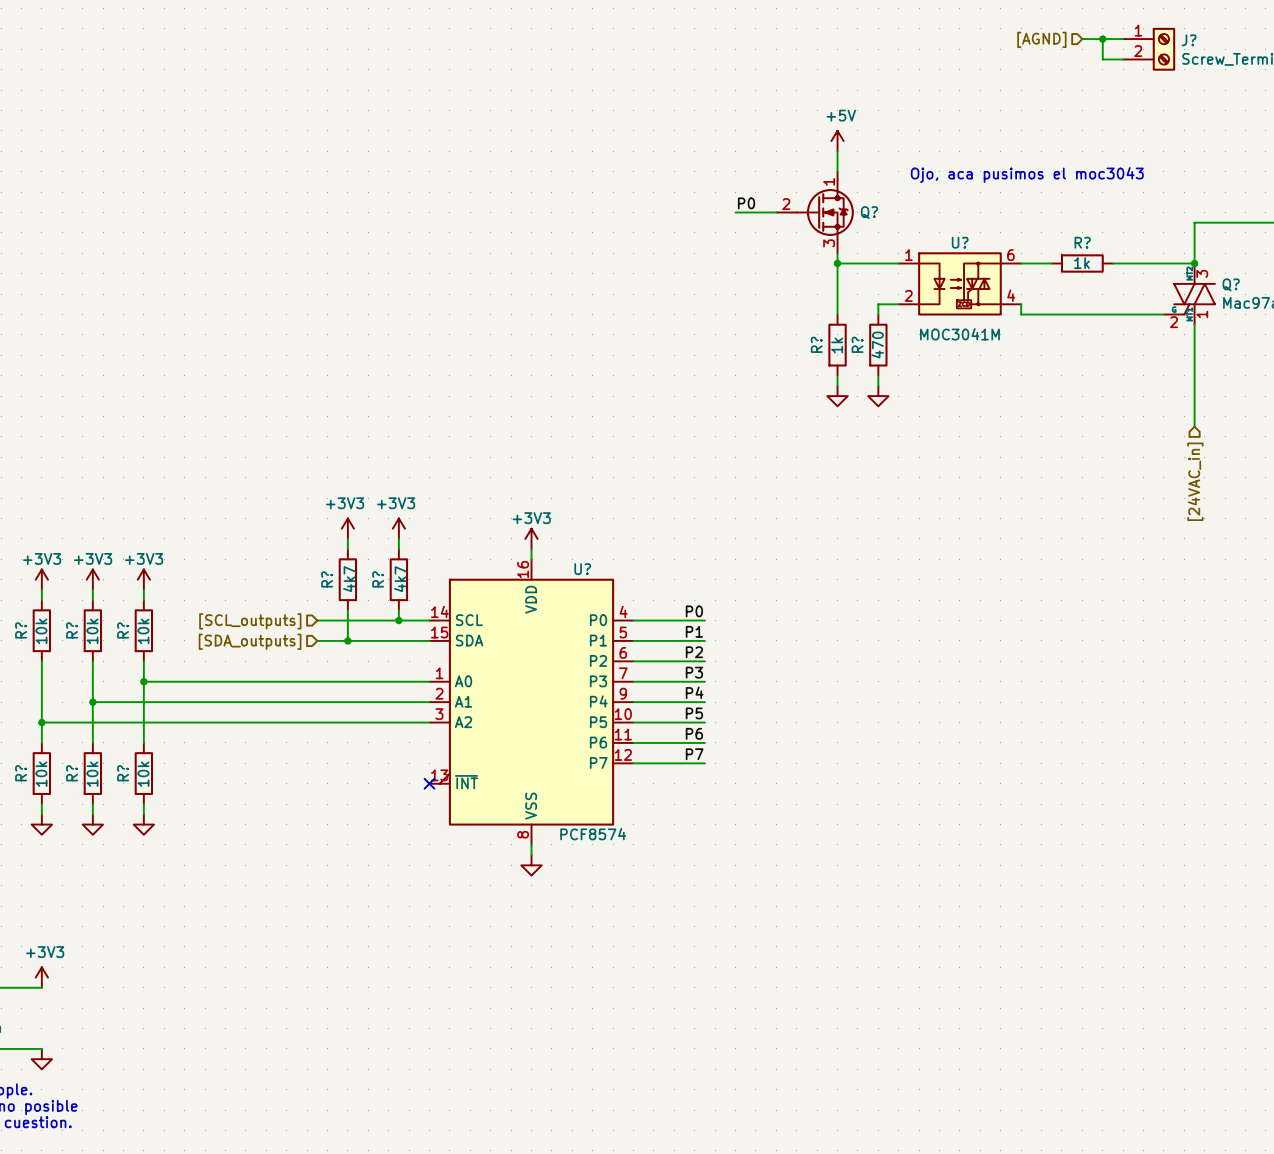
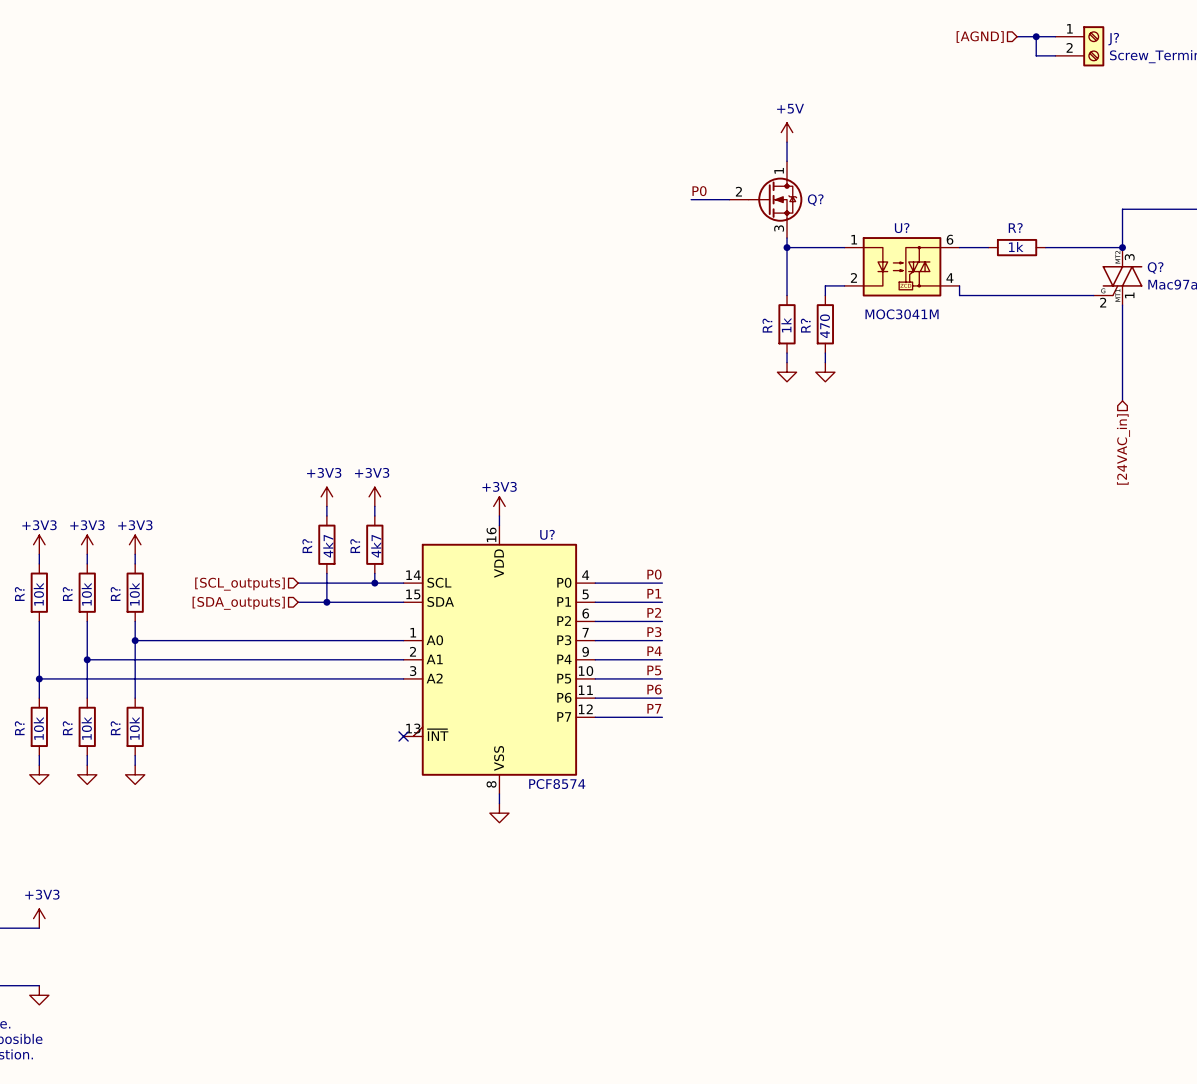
text: Ojo, aca pusimos el moc3043 (1027, 174) -> none

